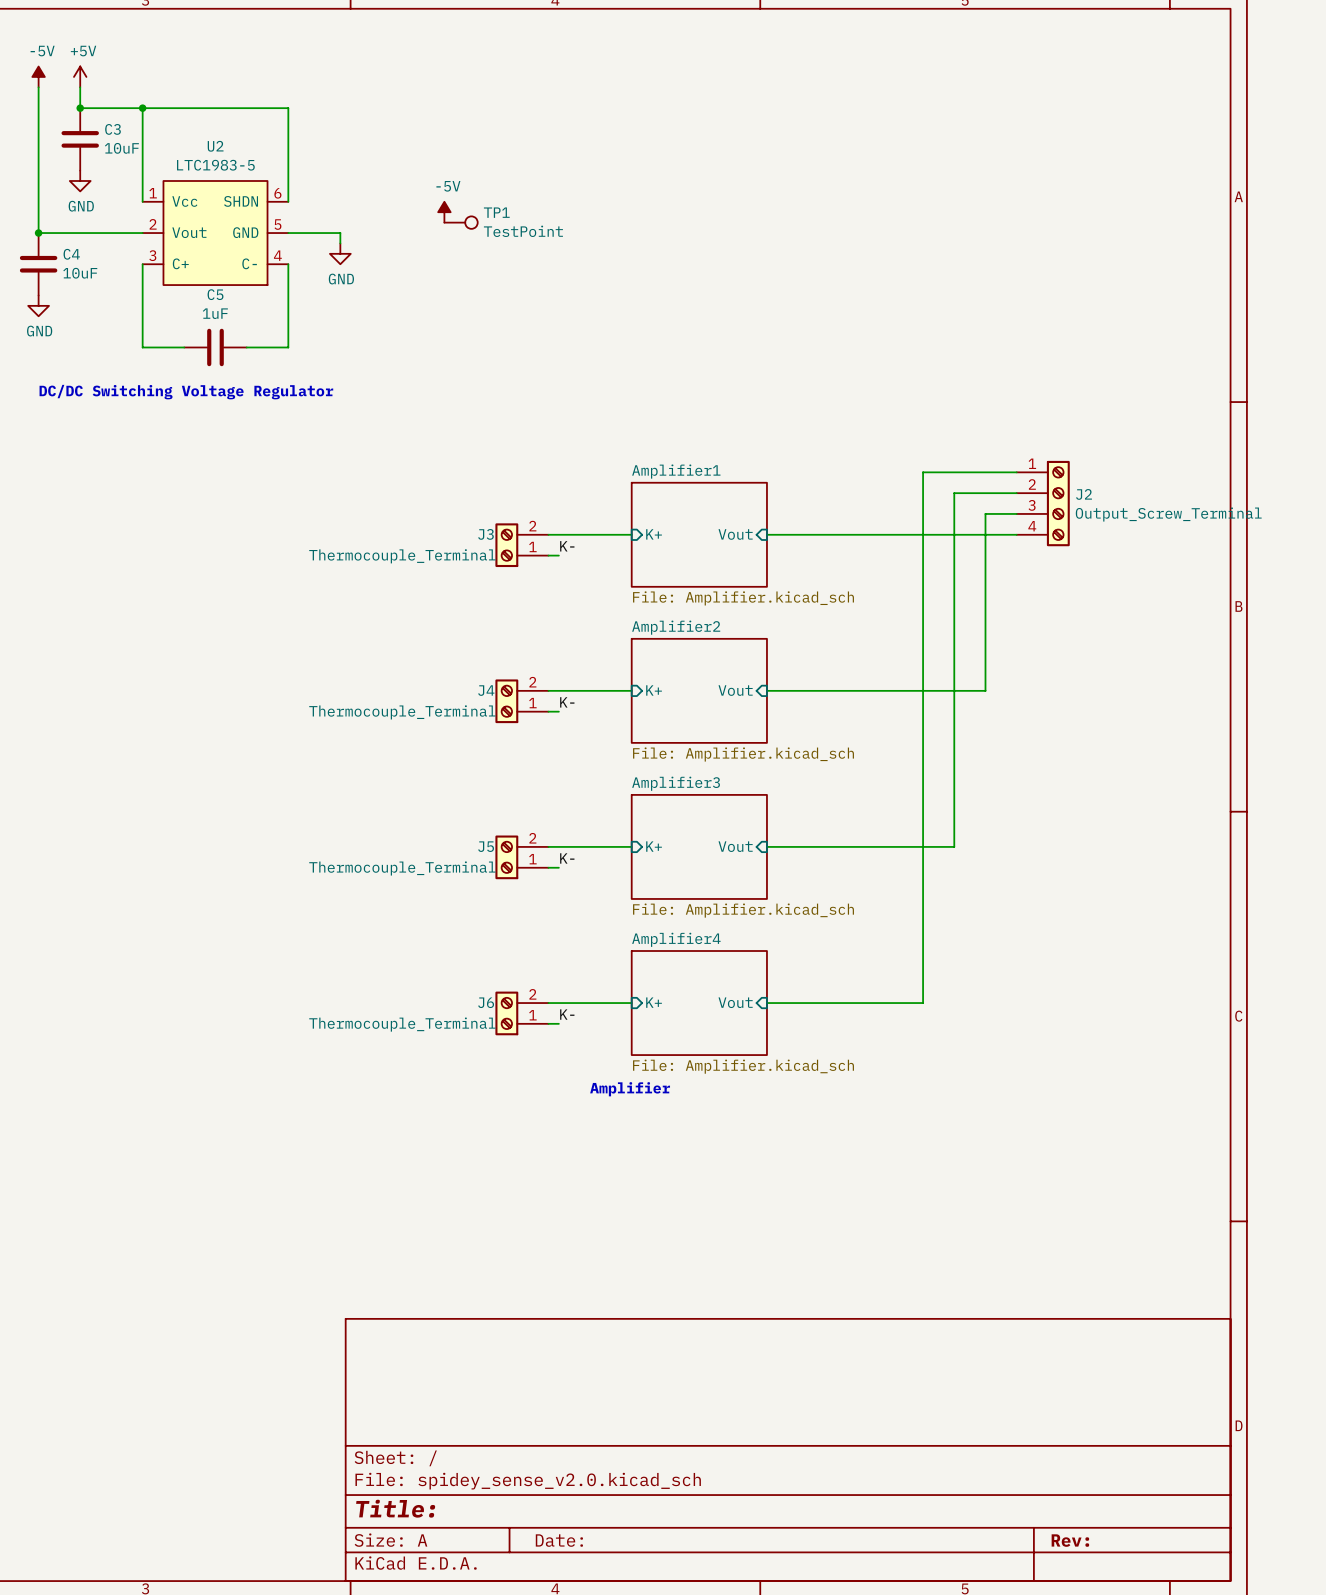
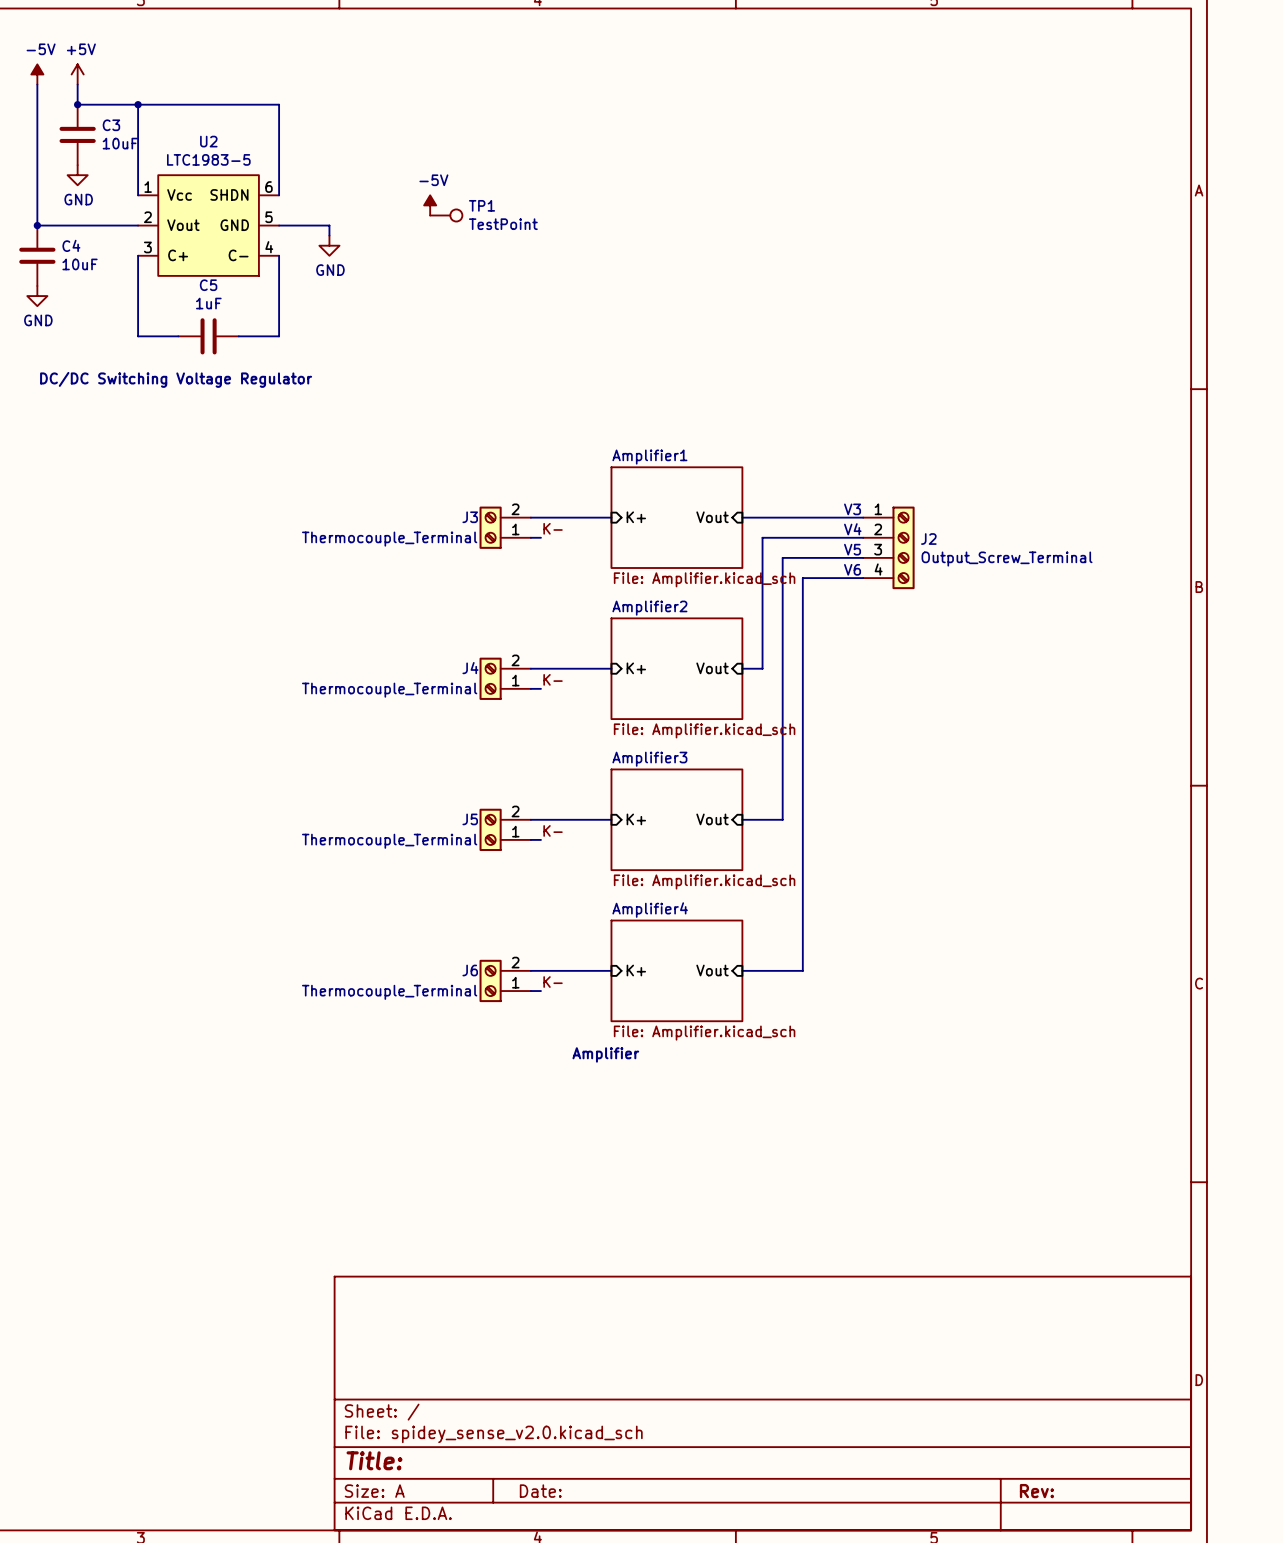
wire: (1016, 472) (923, 472) (923, 1003) (829, 1003) -> (863, 578) (802, 578) (802, 970)
wire: (1016, 493) (954, 493) (954, 846) (808, 846) -> (863, 557) (782, 557) (782, 819)
J2 position: (1043, 503) -> (888, 547)
wire: (1016, 513) (985, 513) (985, 690) (787, 690) -> (863, 537) (762, 537) (762, 668)
text: none -> V3 (852, 509)
wire: (891, 534) (1016, 534) -> none
text: none -> V4 (852, 529)
text: none -> V5 (852, 549)
text: none -> V6 (852, 569)

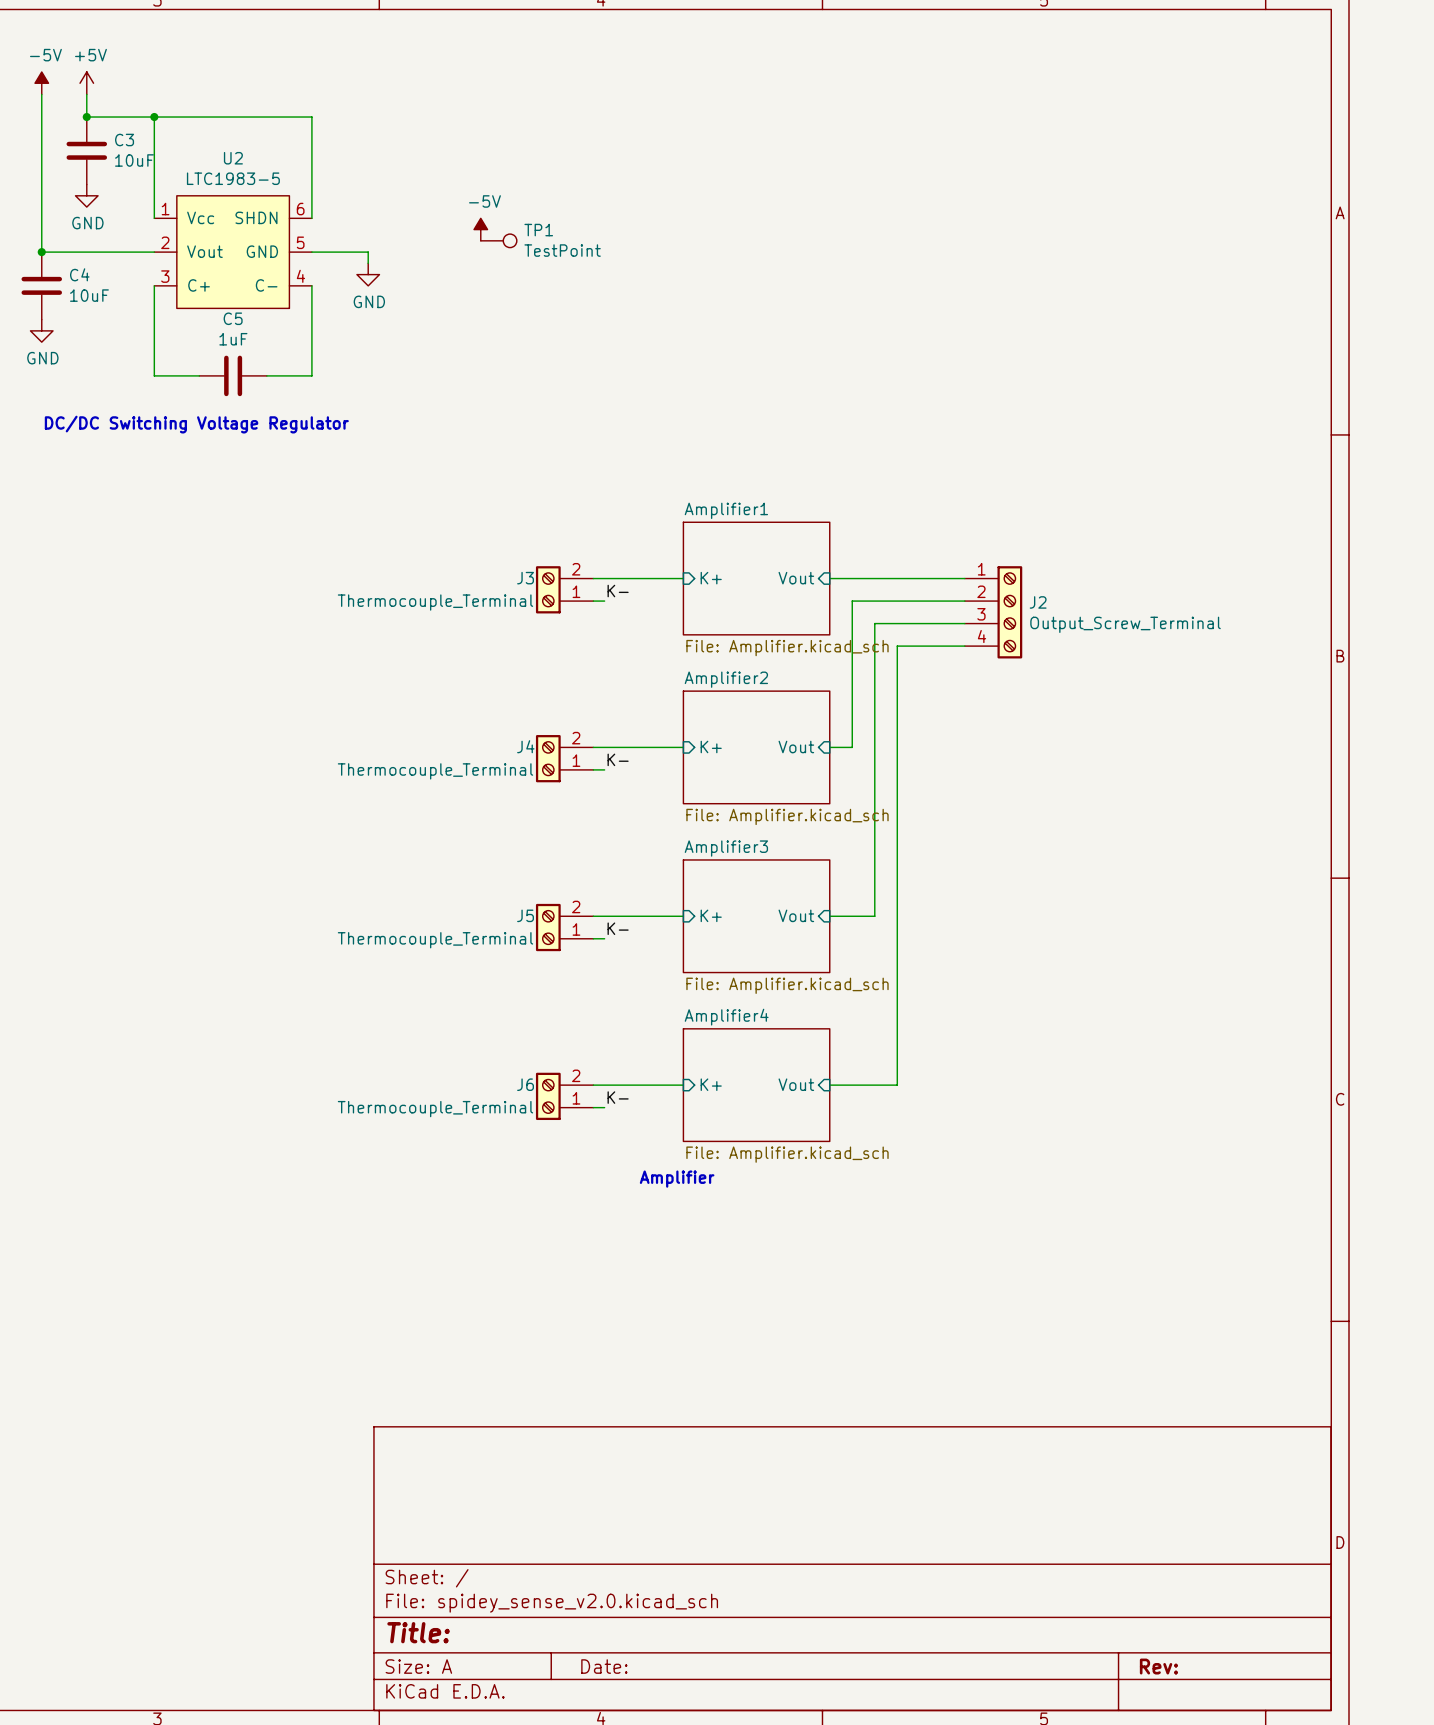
text: V3 (852, 509) -> none
text: V4 (852, 529) -> none
text: V5 (852, 549) -> none
text: V6 (852, 569) -> none

